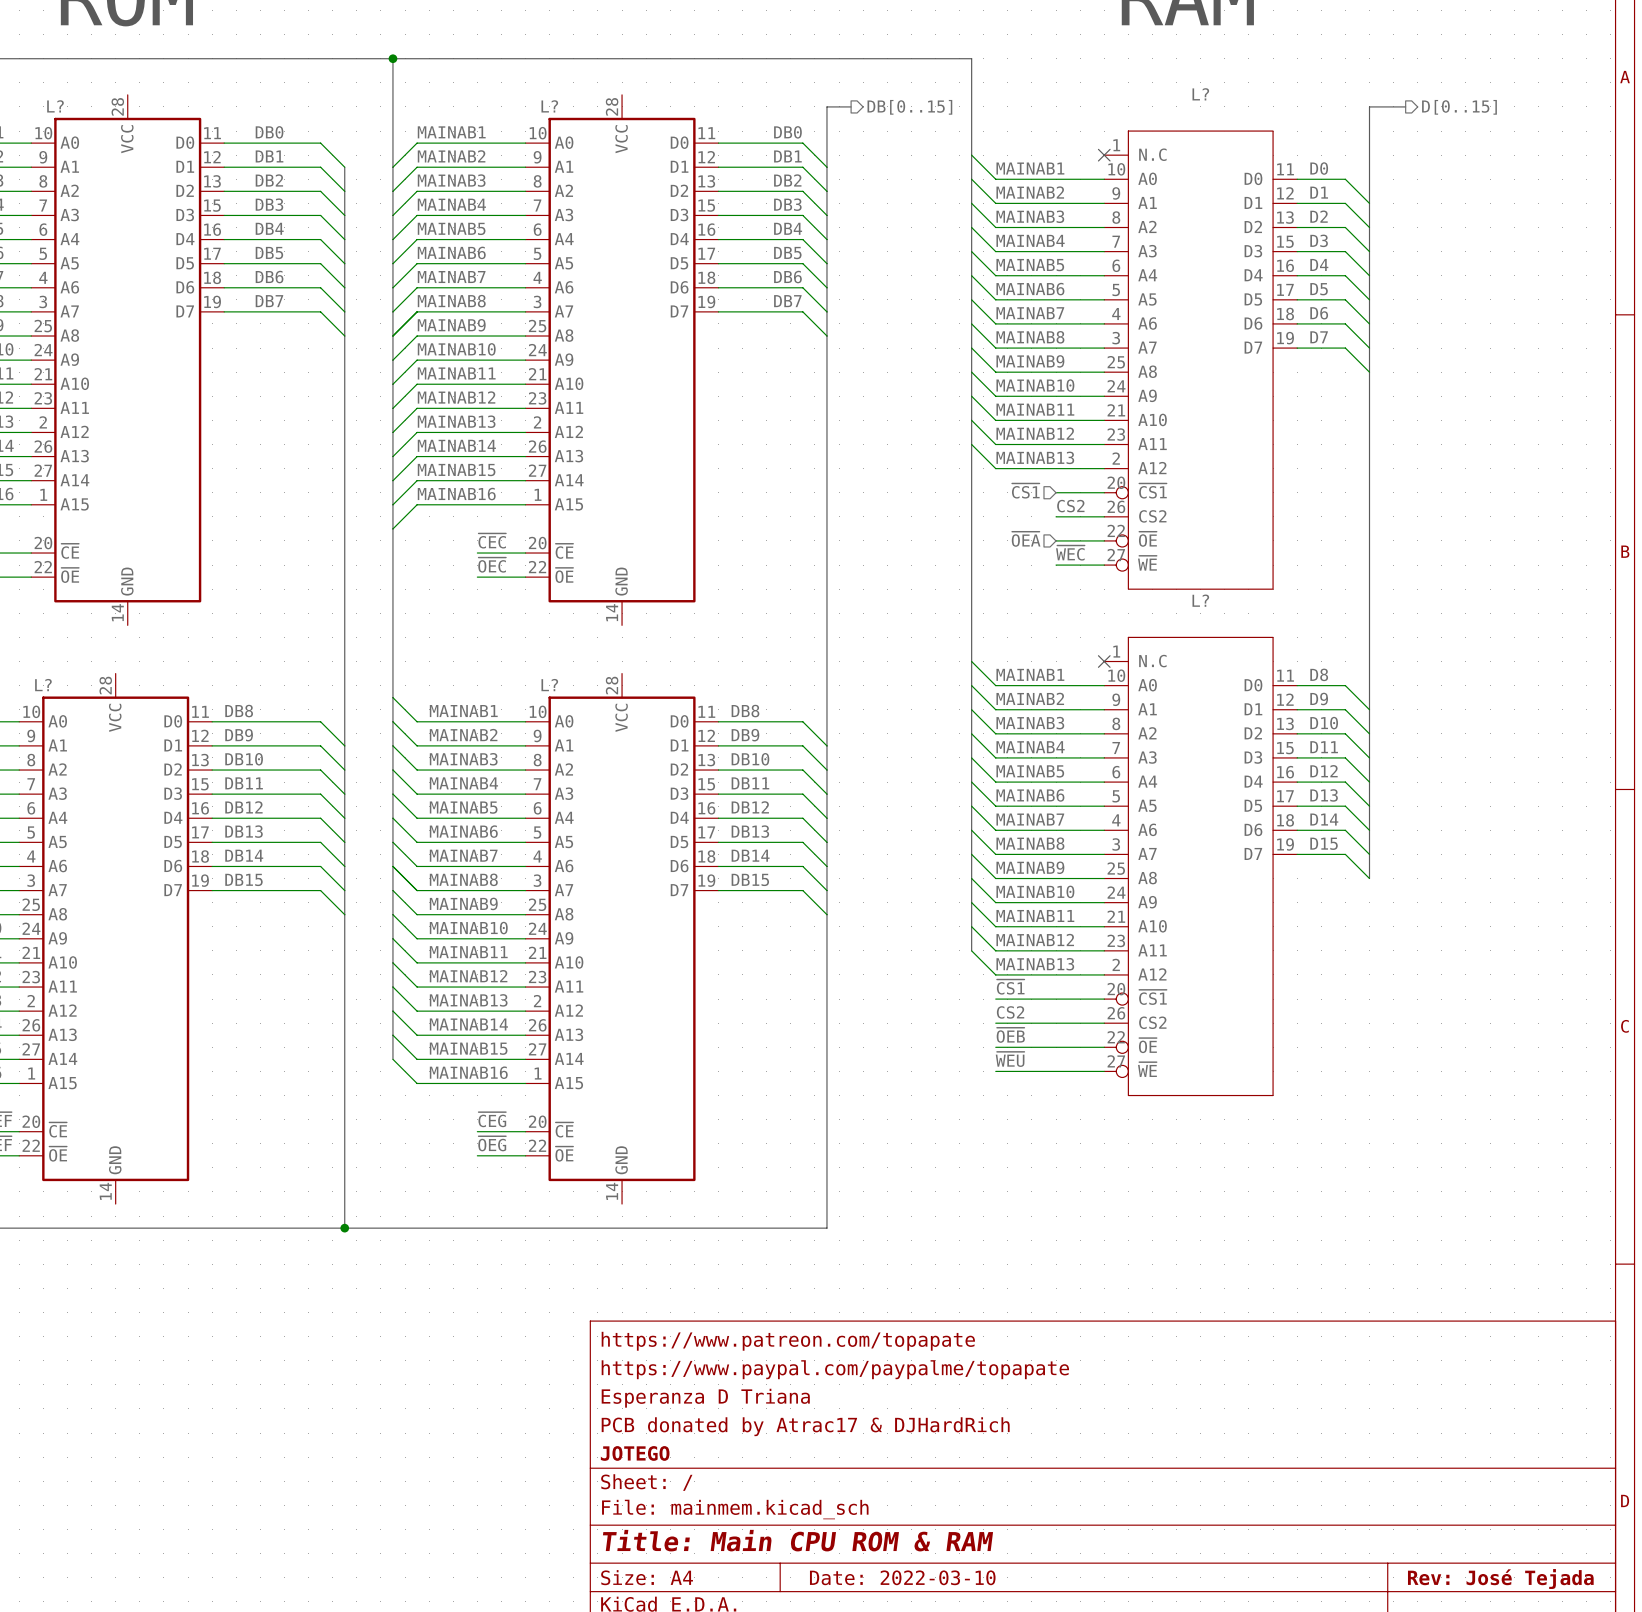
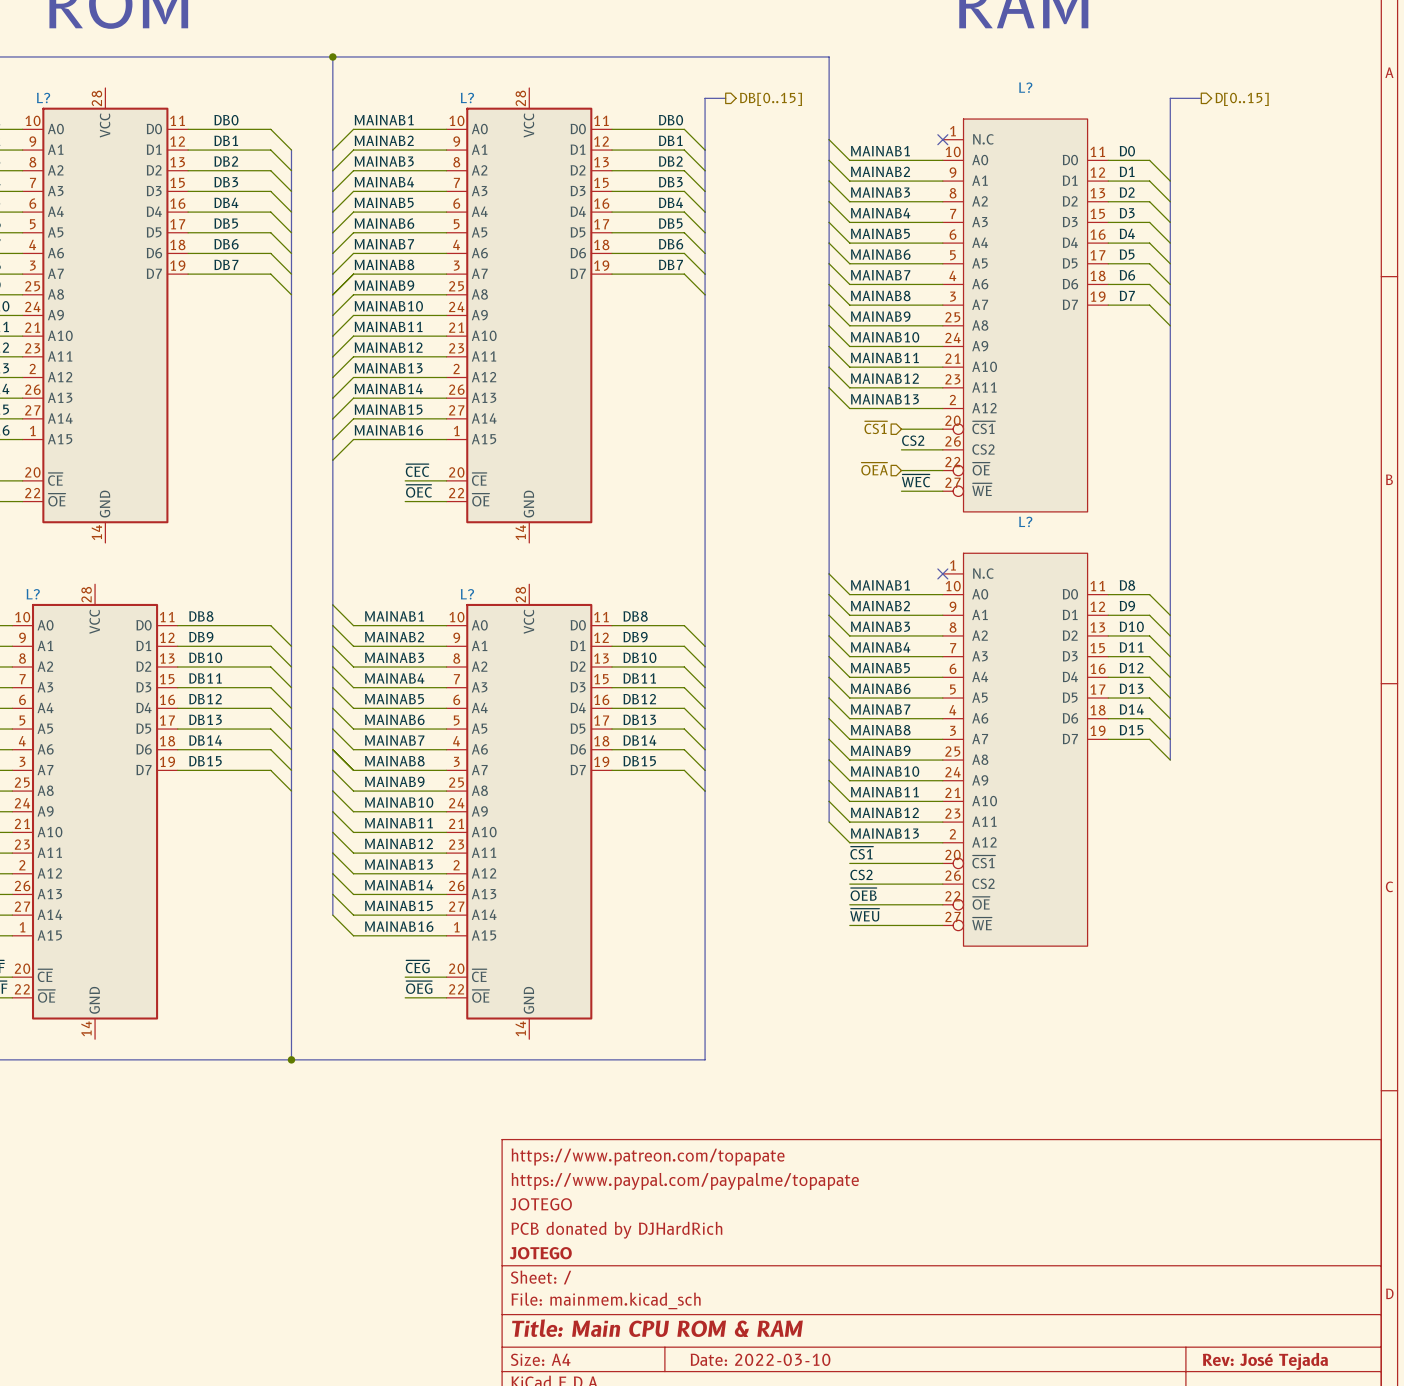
title block: Esperanza D Triana (705, 1398) -> JOTEGO (541, 1204)
title block: PCB donated by Atrac17 & DJHardRich (805, 1426) -> PCB donated by DJHardRich (616, 1230)

